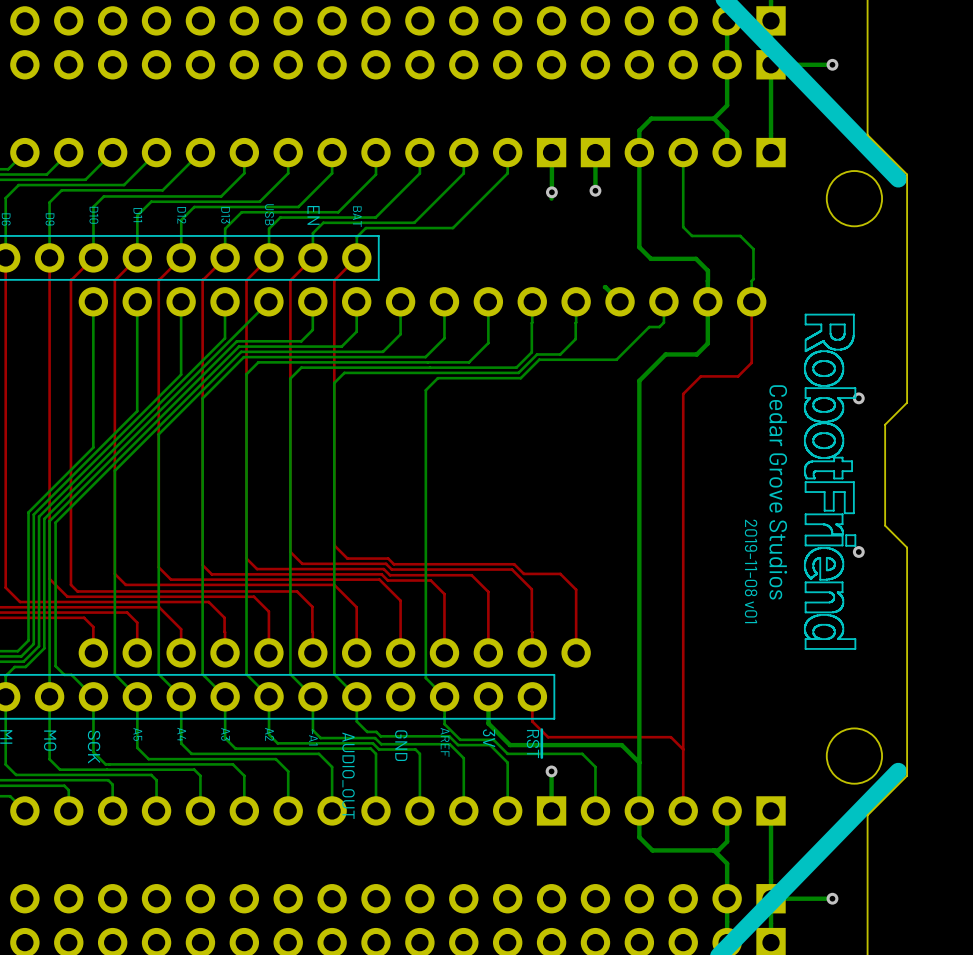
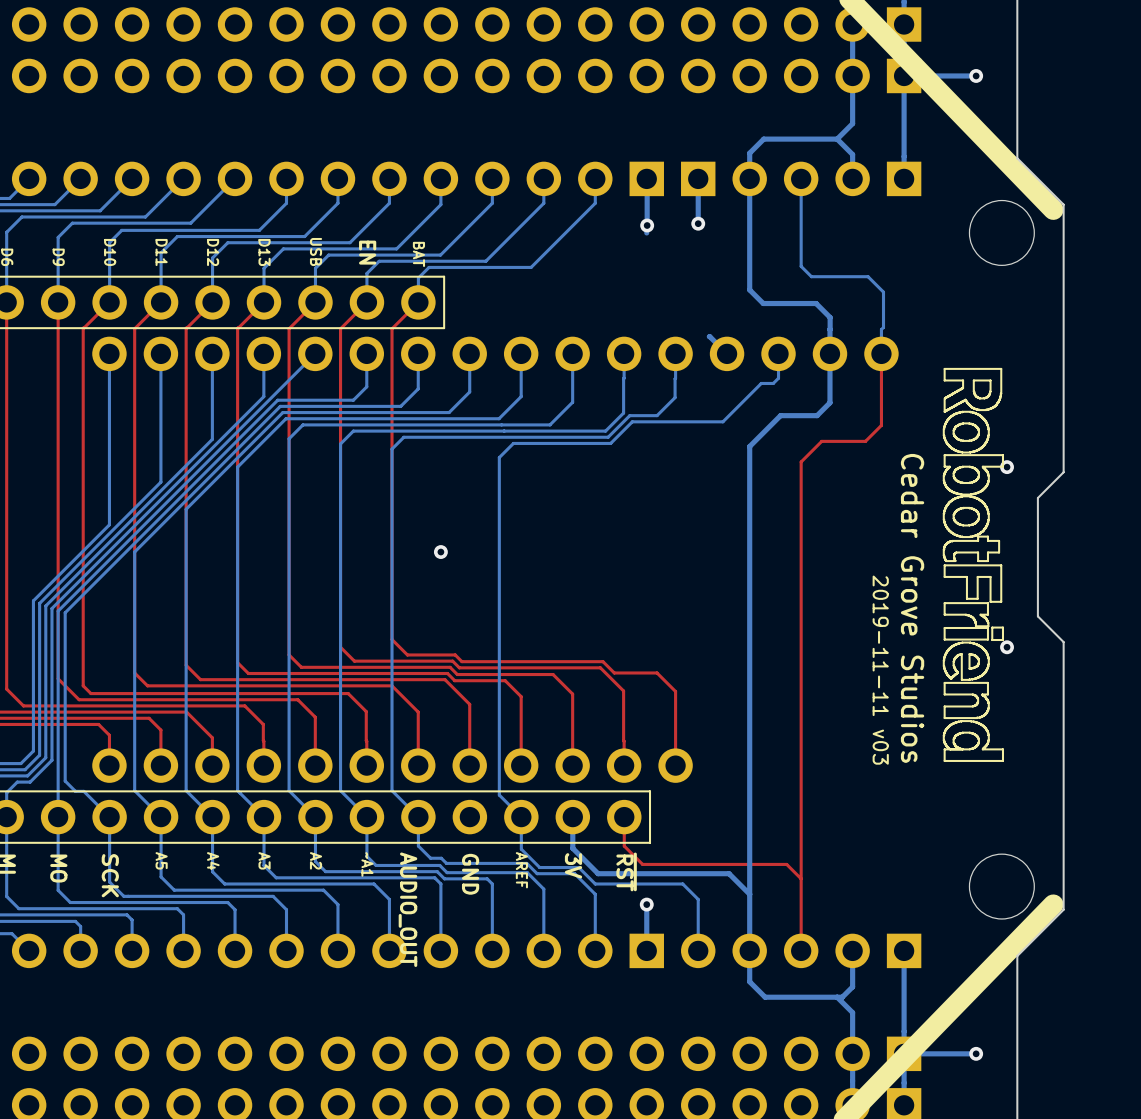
via: none -> (440, 552)
text: 2019-11-08 v01 (751, 571) -> 2019-11-11 v03 (880, 670)

